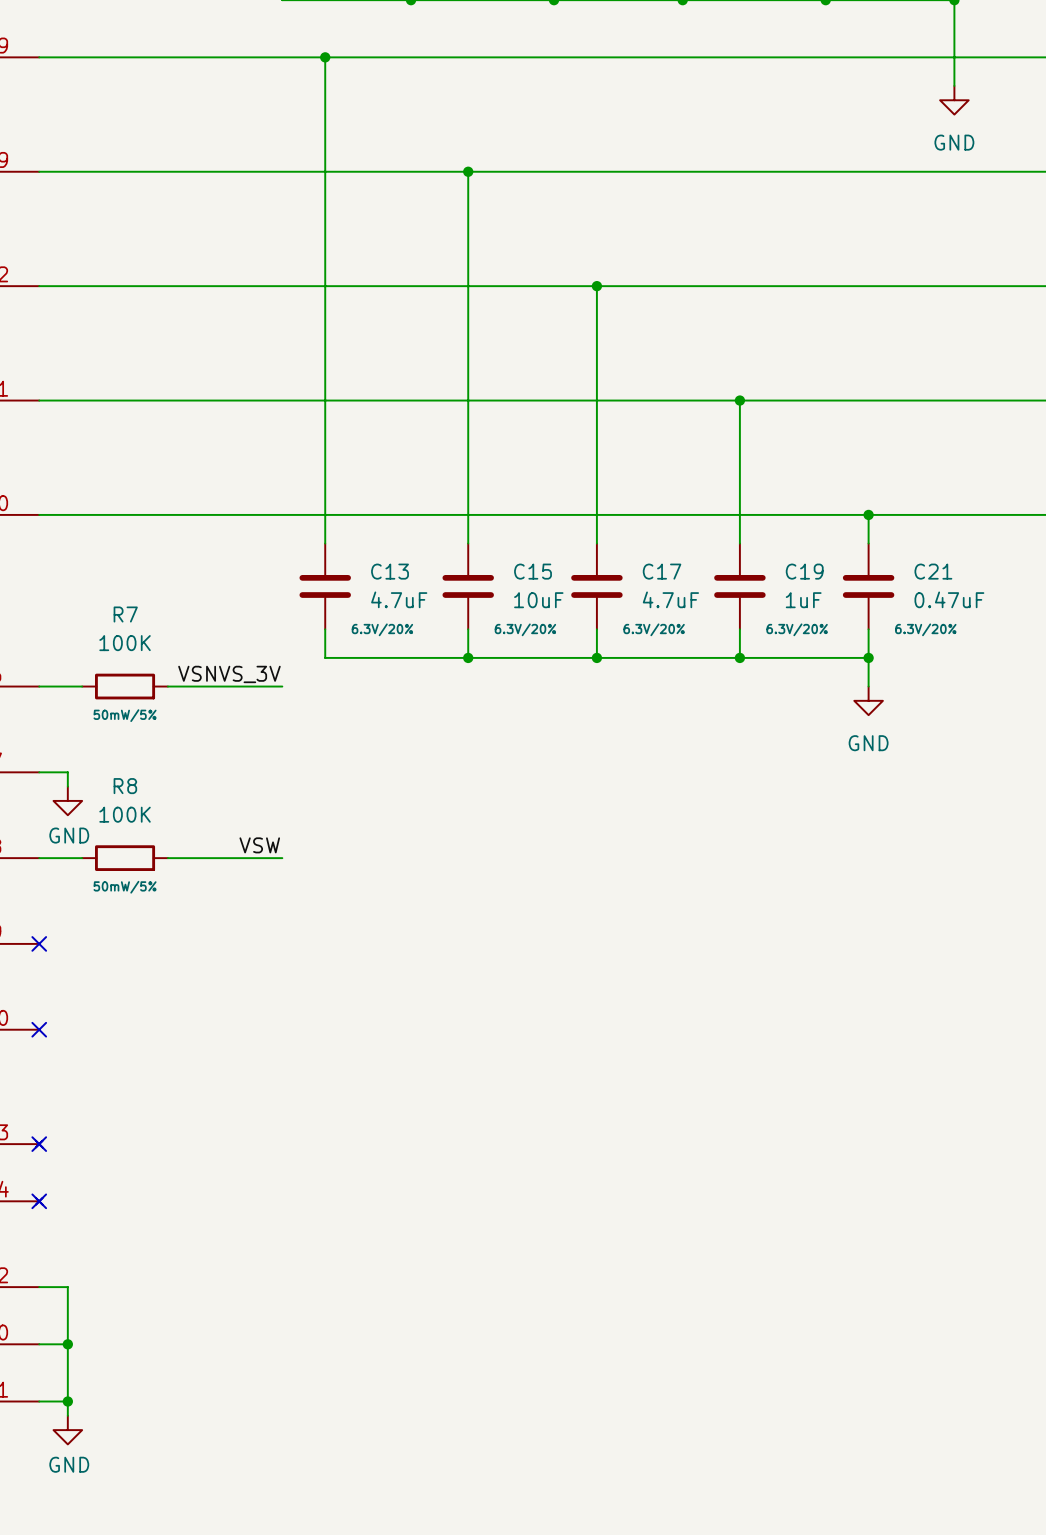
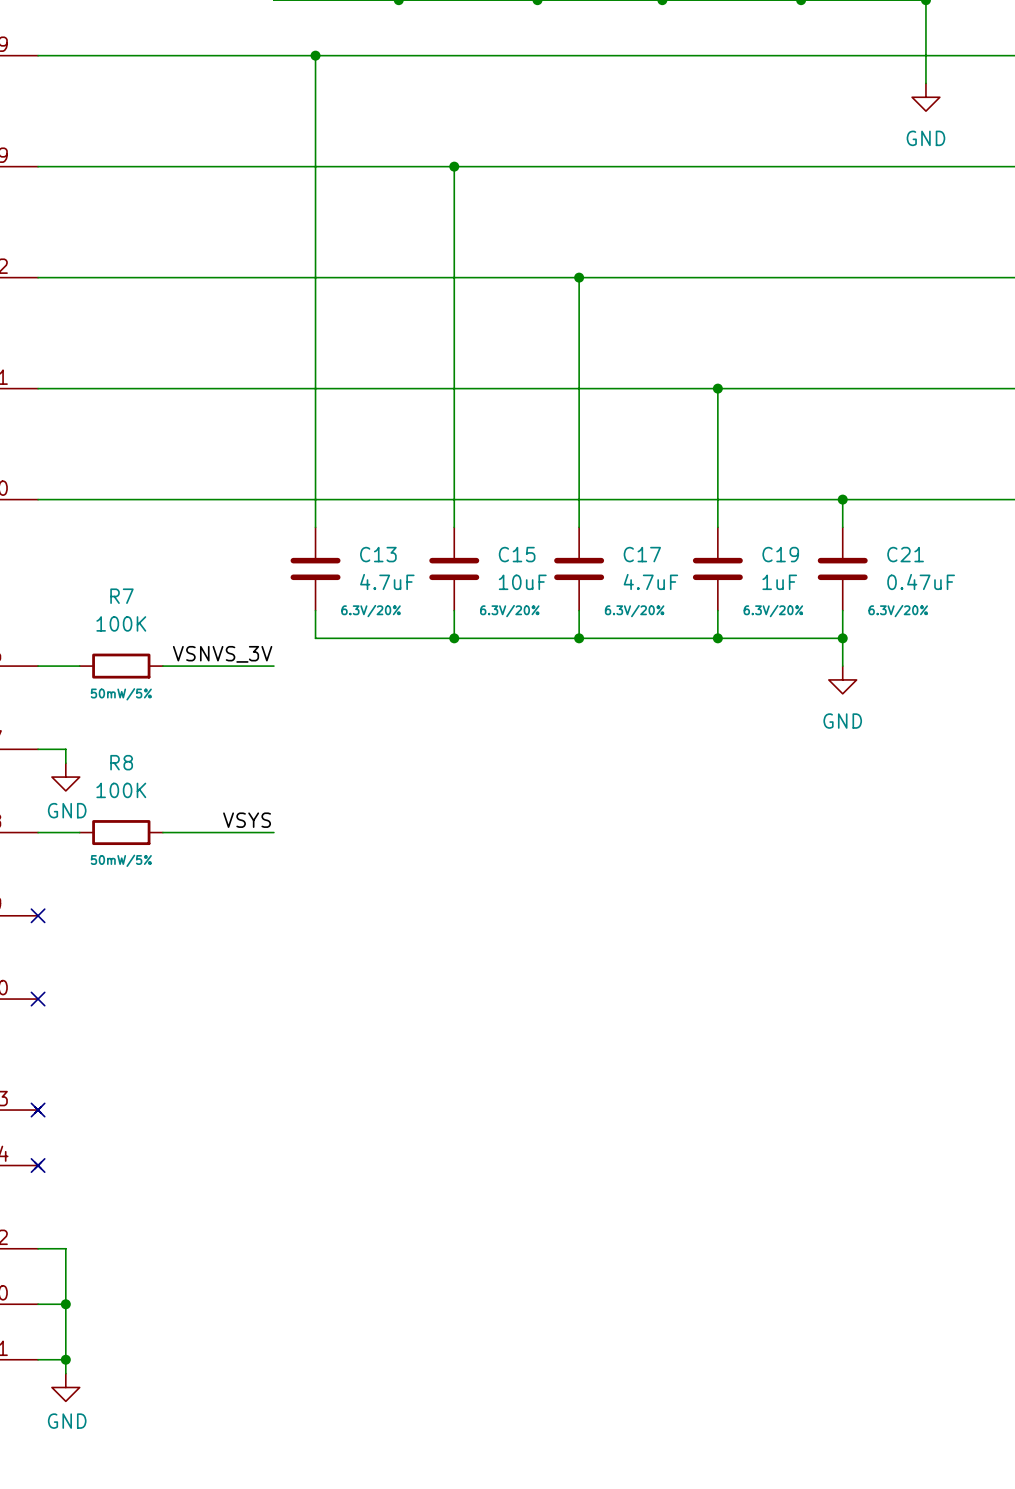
label: VSW (259, 845) -> VSYS (247, 820)

